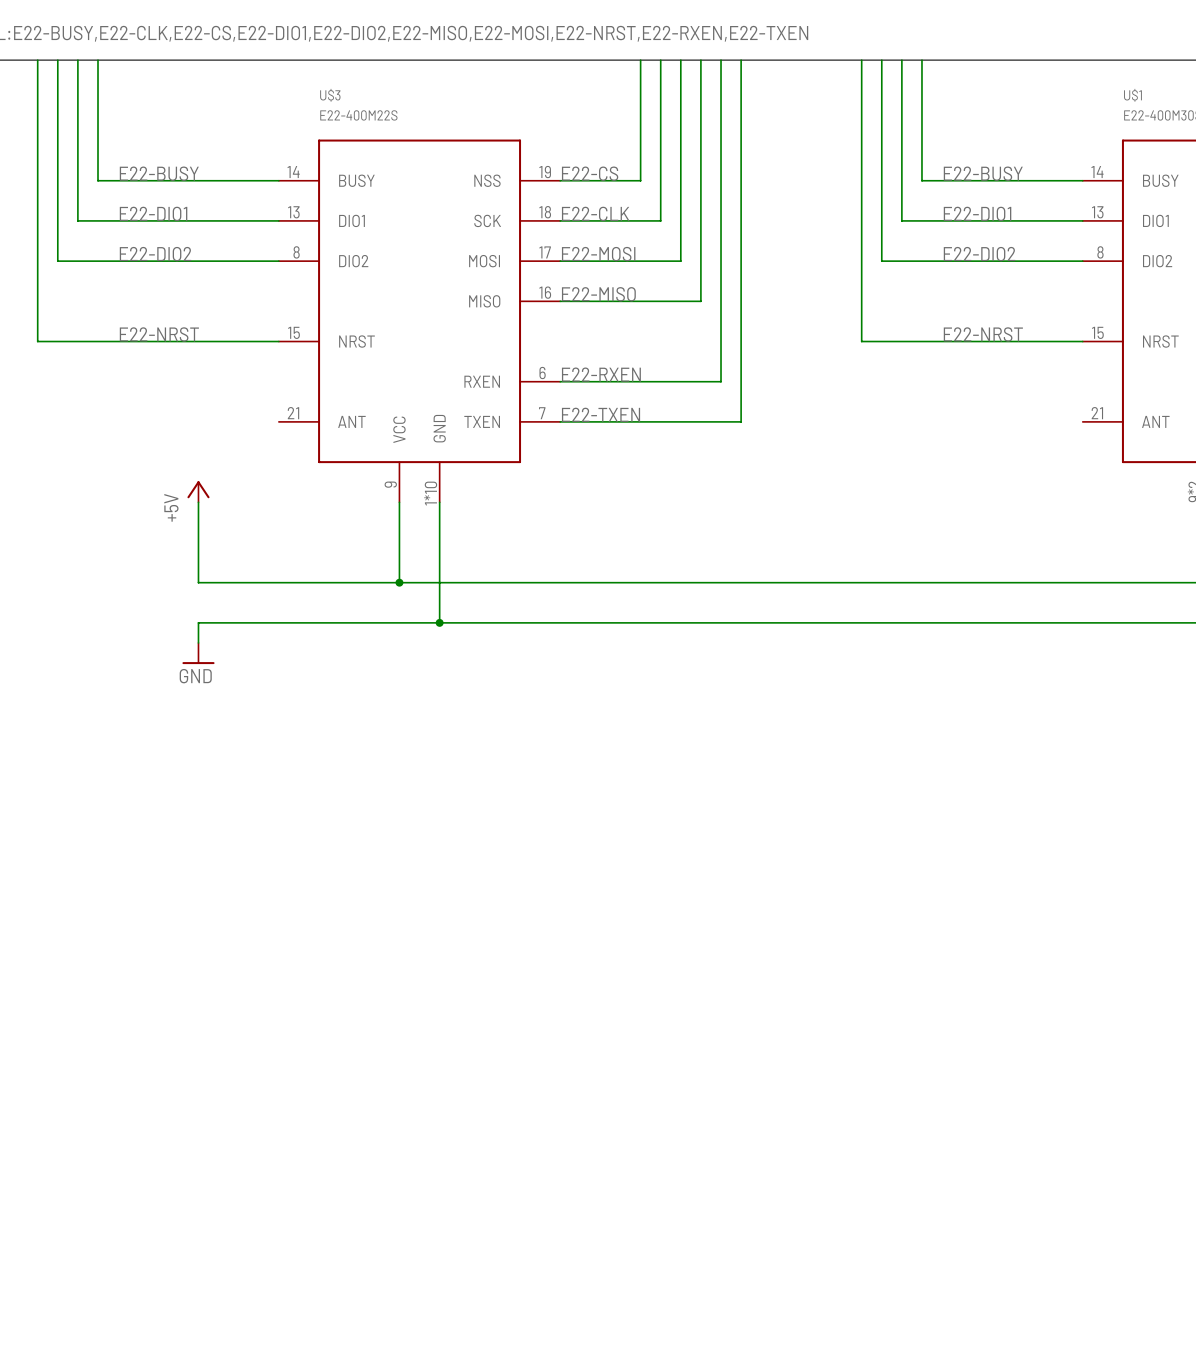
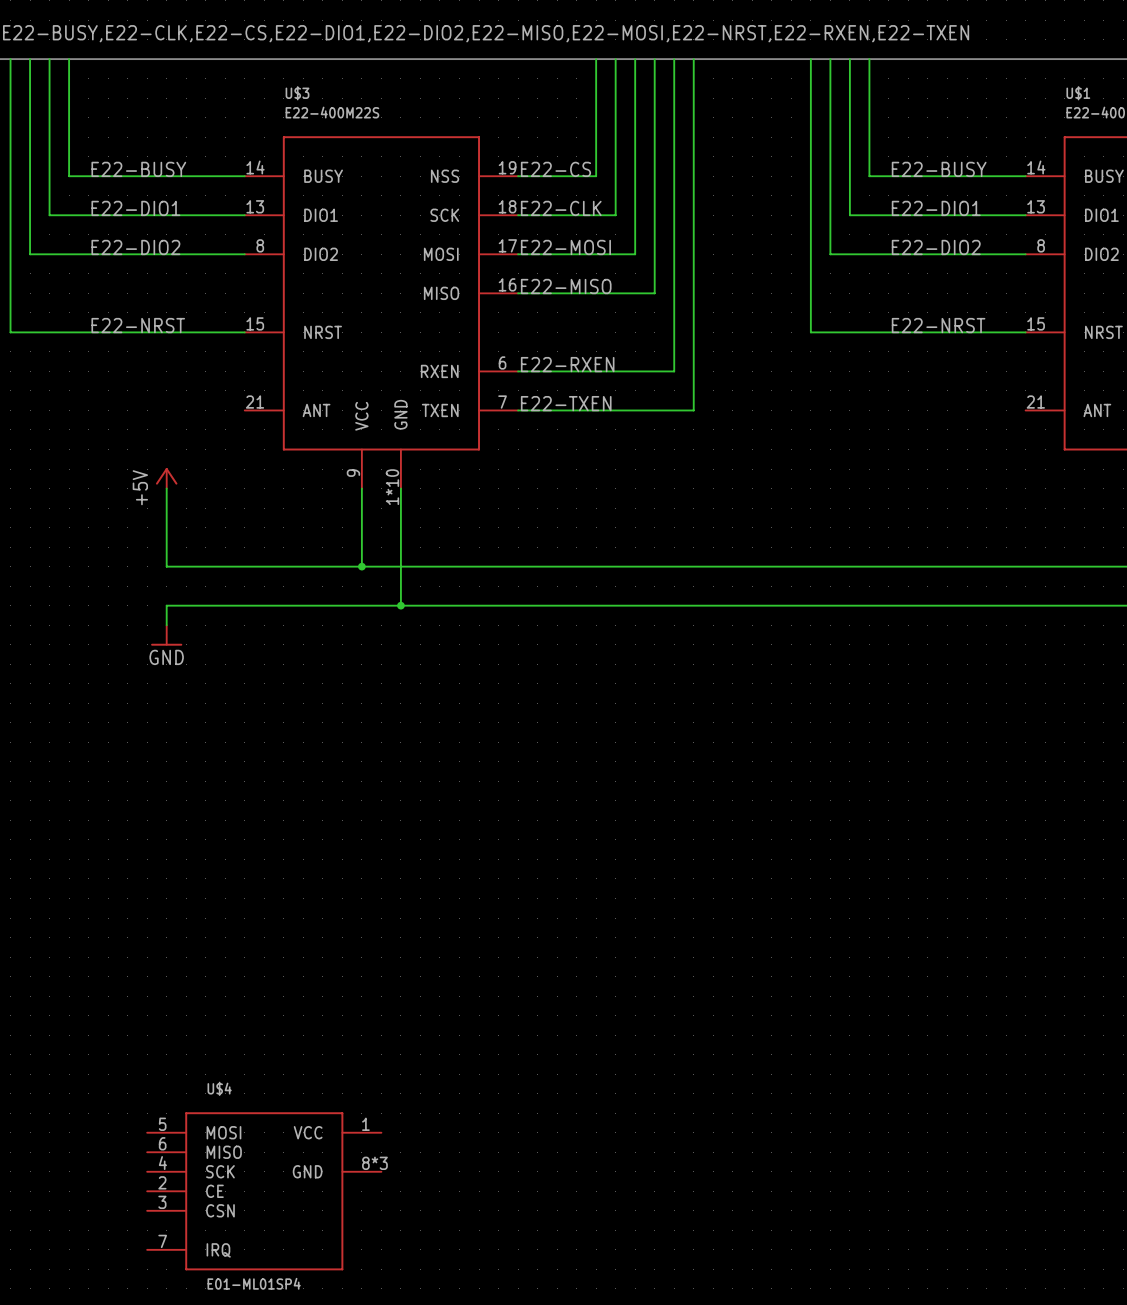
U$4: none -> E01-ML01SP4 (264, 1191)

